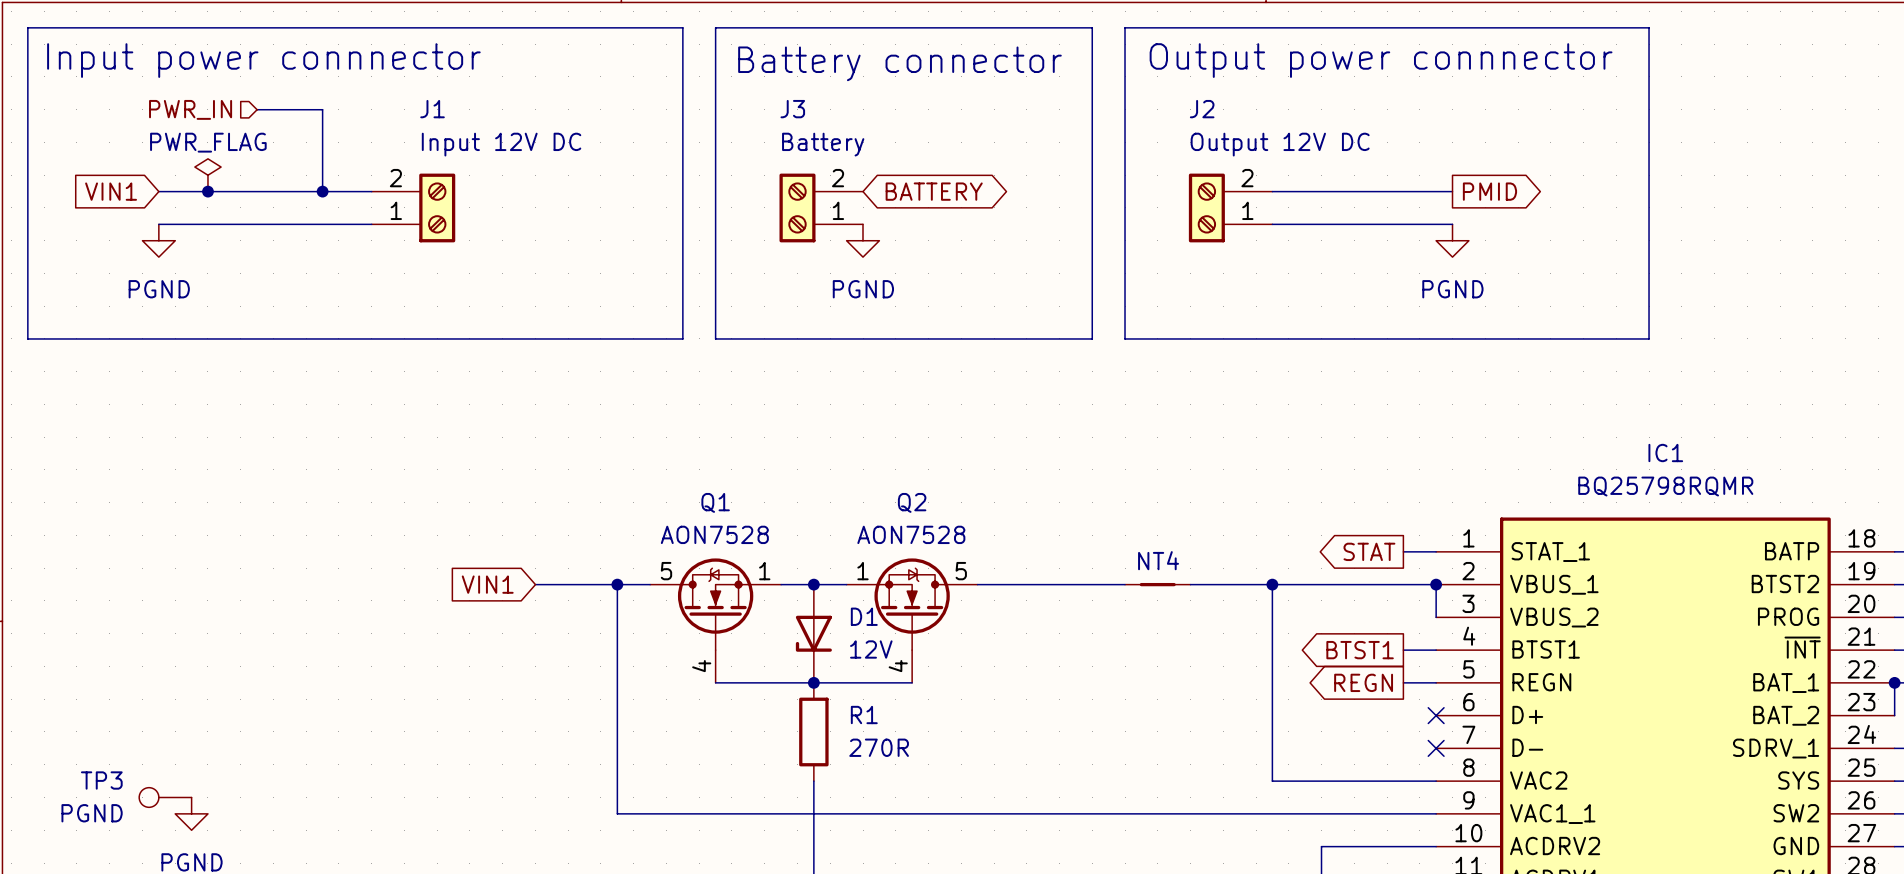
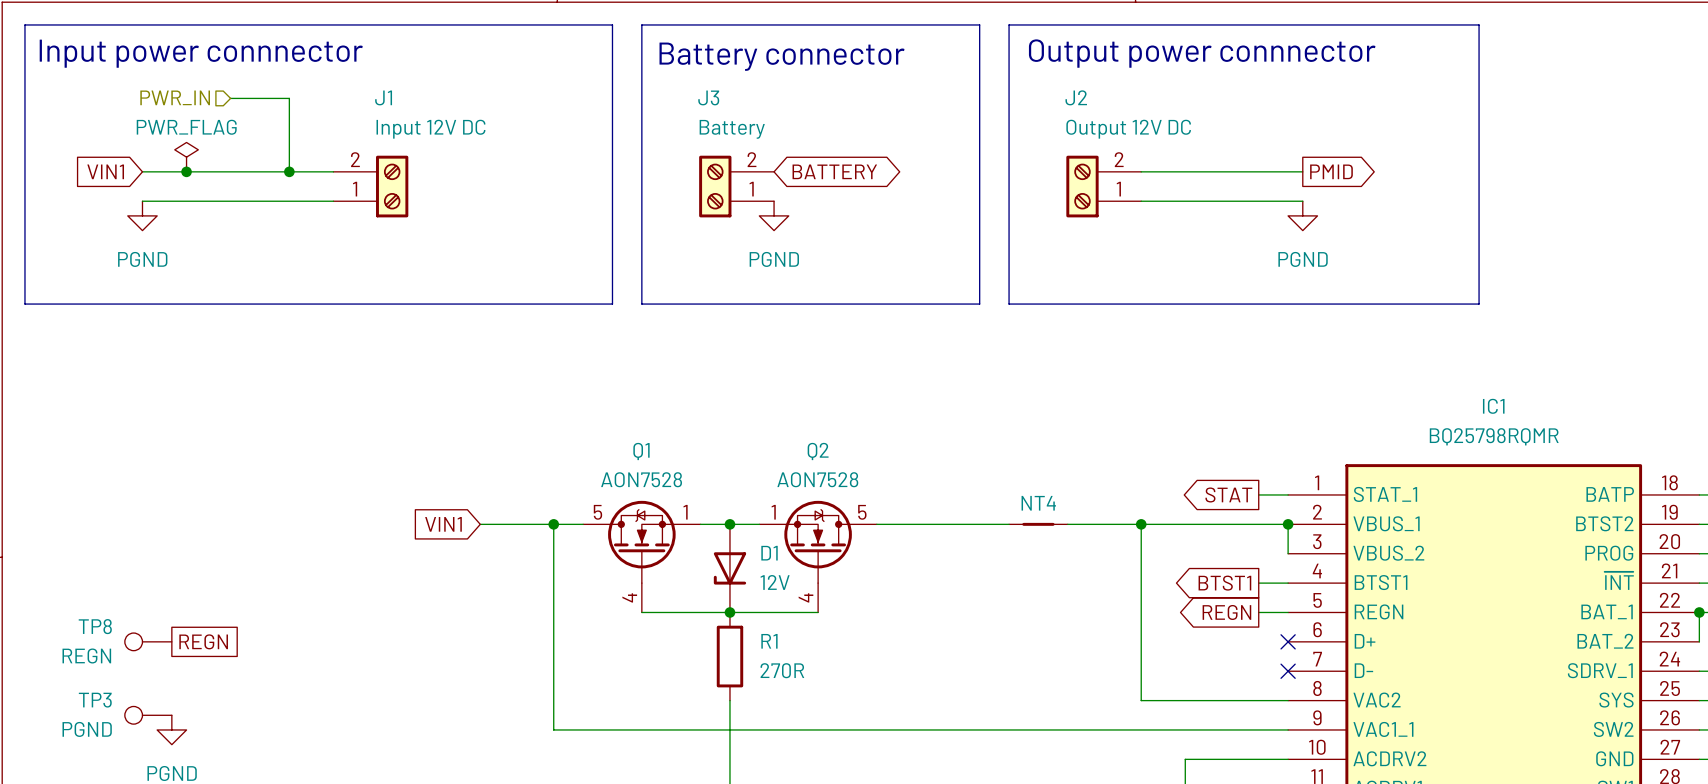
TP8: none -> REGN (148, 641)
global label: none -> REGN (203, 641)

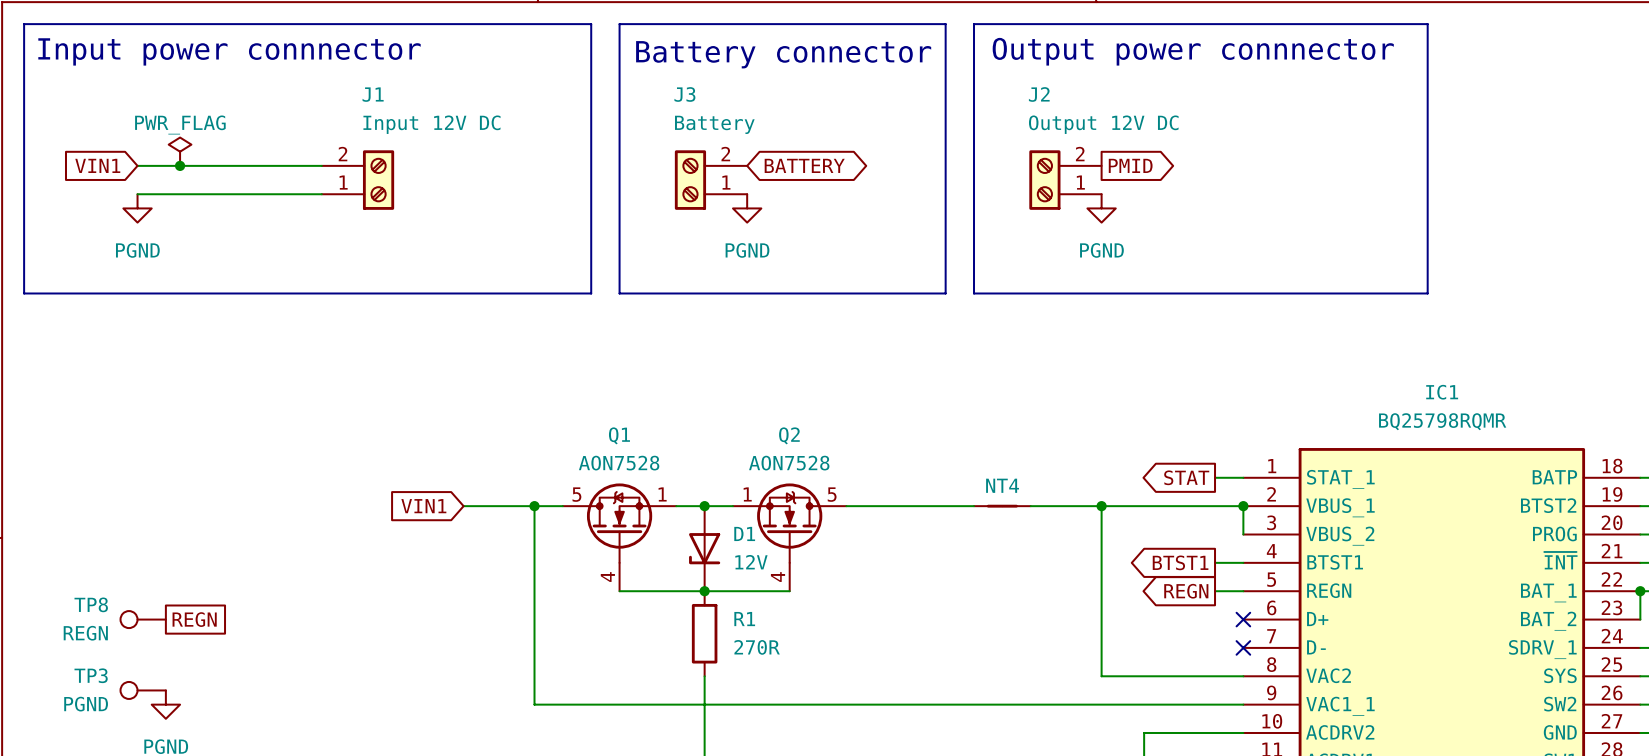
hierarchical label: PWR_IN (175, 97) -> none
wire: (230, 98) (289, 98) (289, 171) -> none
junction: (289, 171) -> none
wire: (1141, 171) (1302, 171) -> none
global label position: PMID (1331, 171) -> PMID (1130, 165)
wire: (1141, 201) (1302, 201) -> none
power symbol position: PGND (1302, 215) -> PGND (1101, 208)

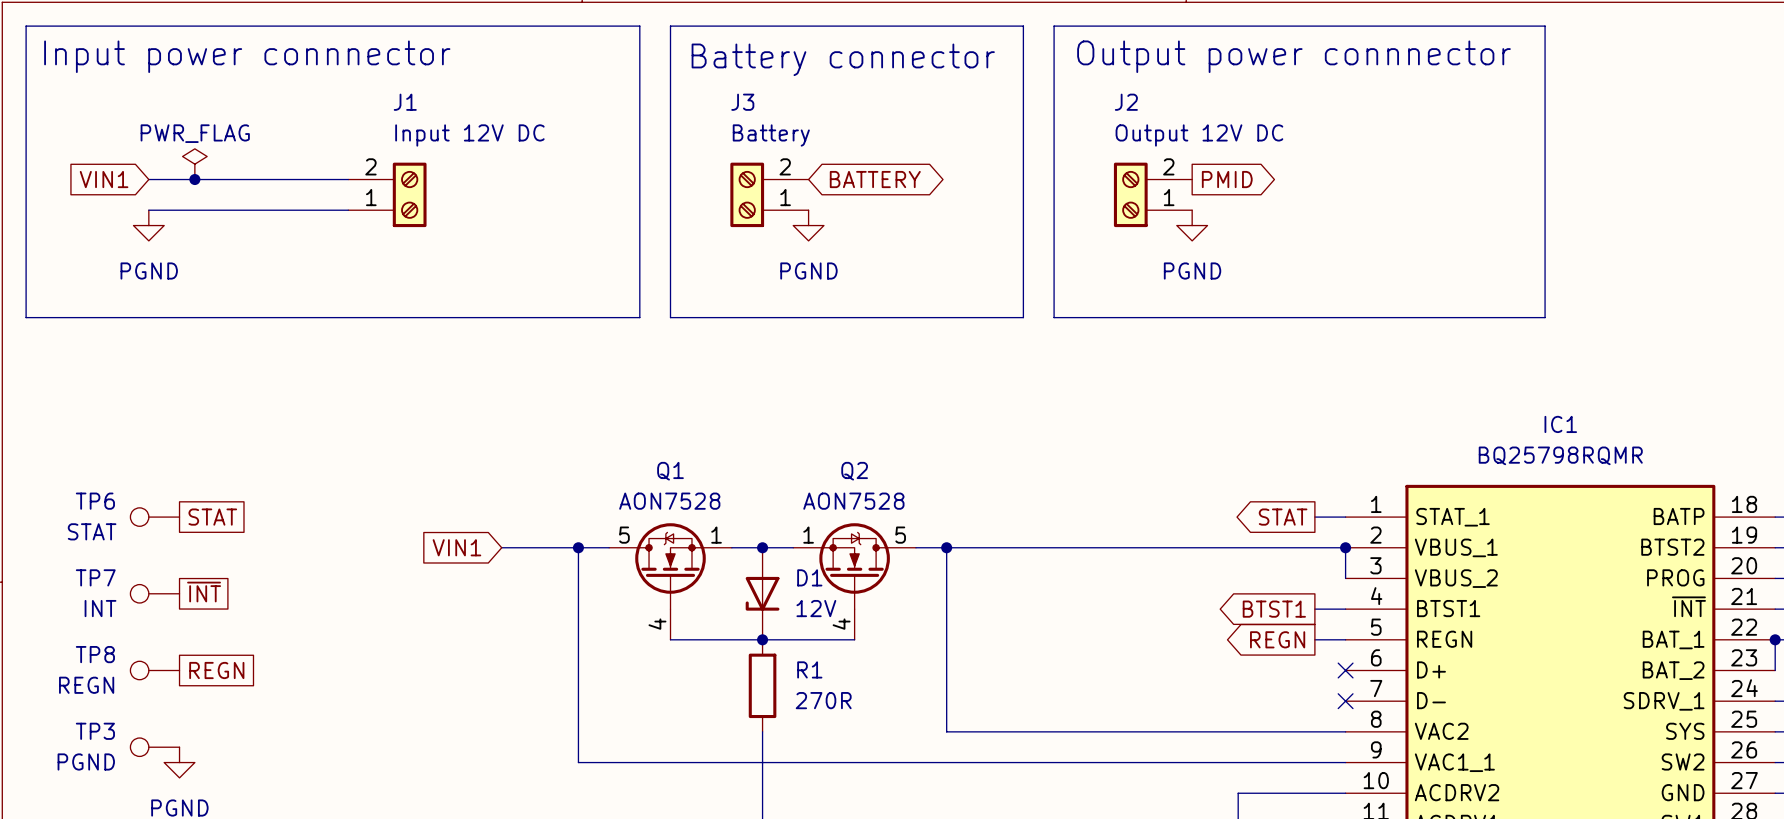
TP6: none -> STAT (154, 517)
global label: none -> STAT (212, 517)
junction: none -> (946, 547)
NT4: (1002, 506) -> none
wire: (1101, 506) (1101, 676) -> (946, 547) (946, 731) (1192, 731)
junction: (1101, 506) -> none
global label: none -> ~{INT} (204, 592)
TP7: none -> INT (154, 593)

